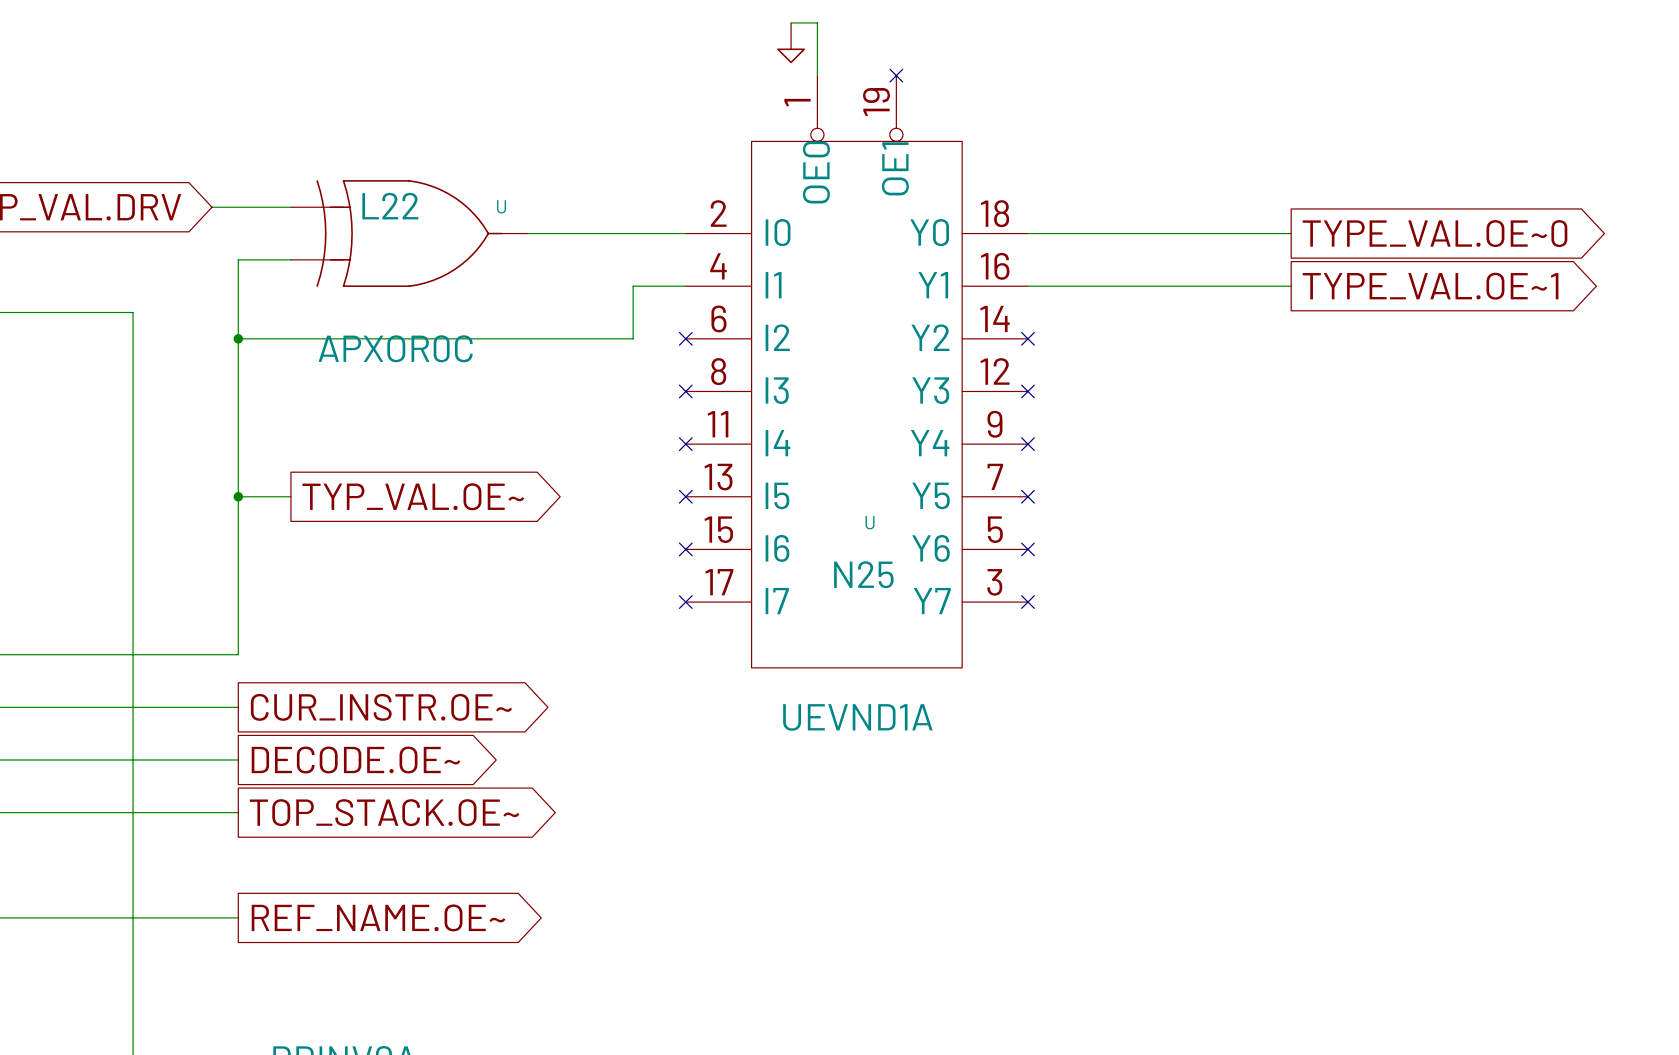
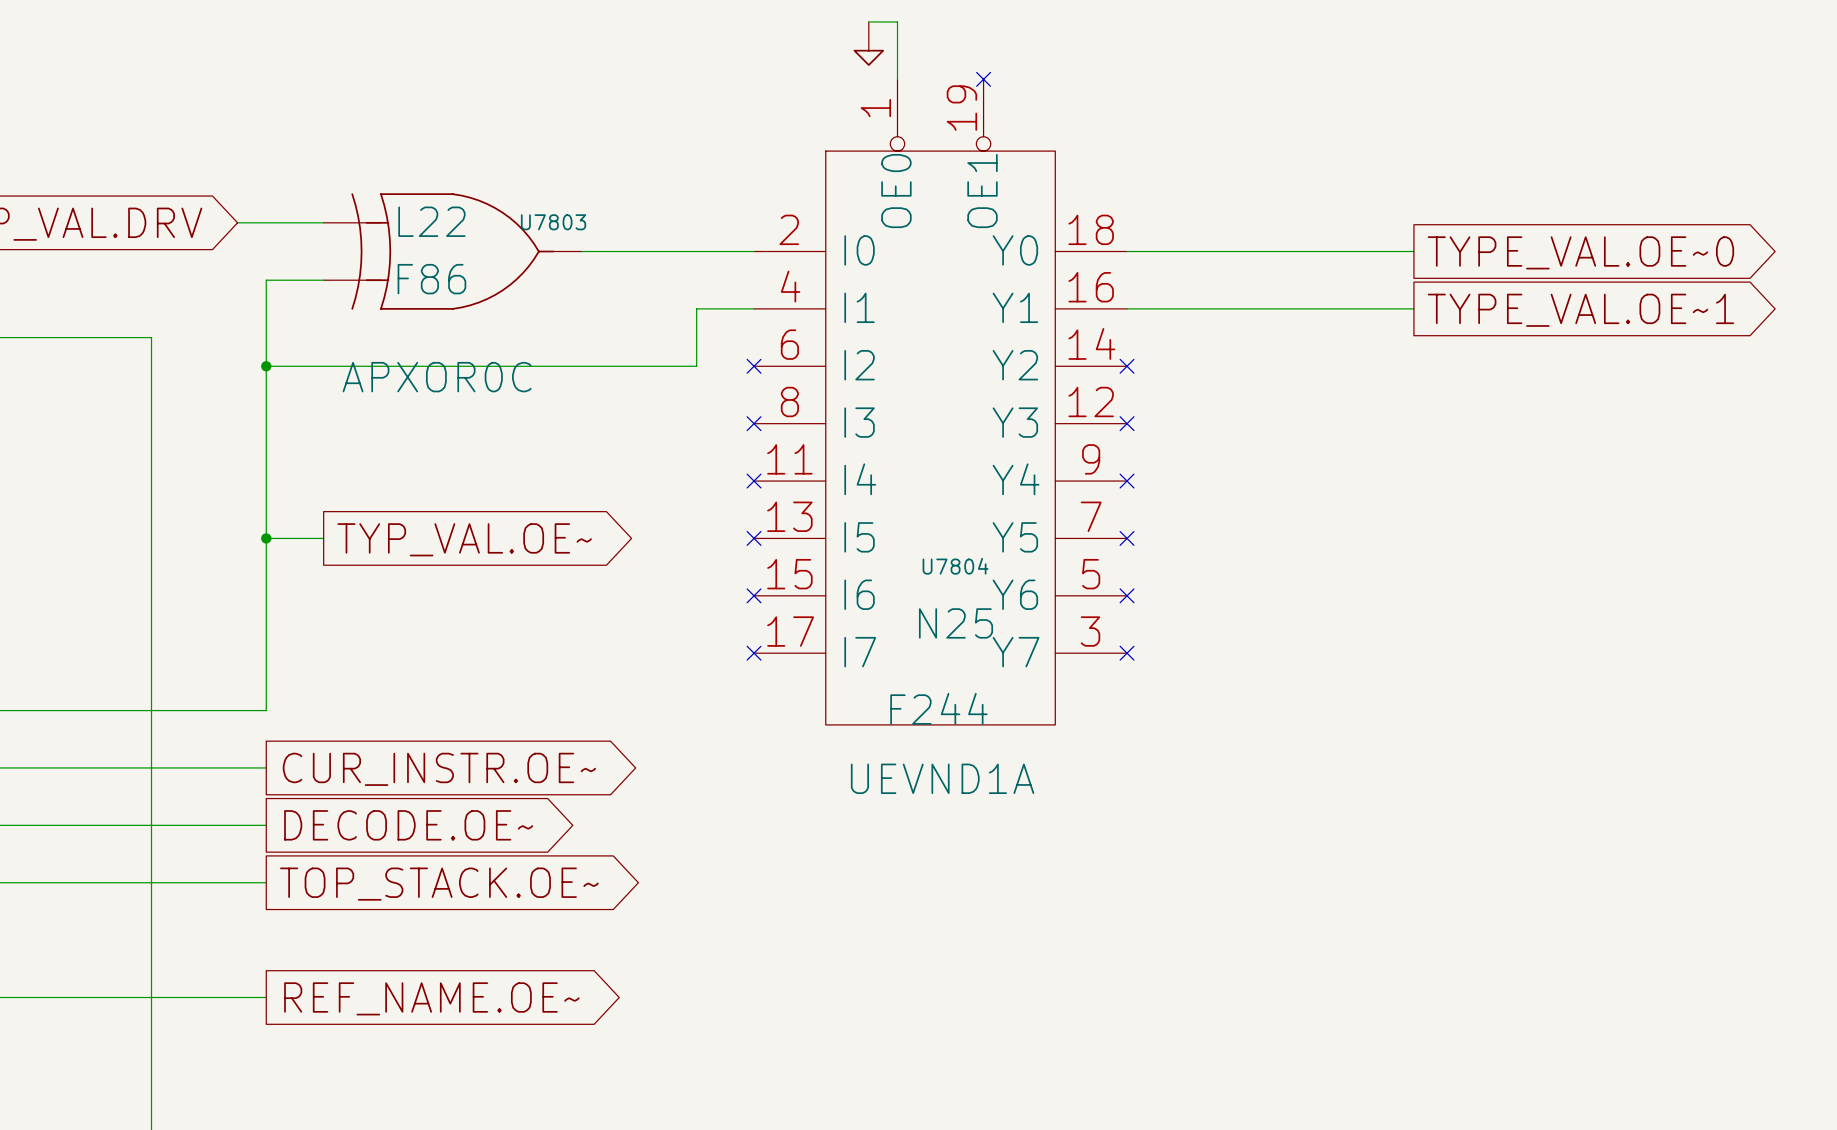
U name: U (501, 206) -> U7803 (553, 222)
U value: none -> F86 (431, 279)
U name: U (870, 522) -> U7804 (955, 566)
U value: none -> F244 (938, 708)

